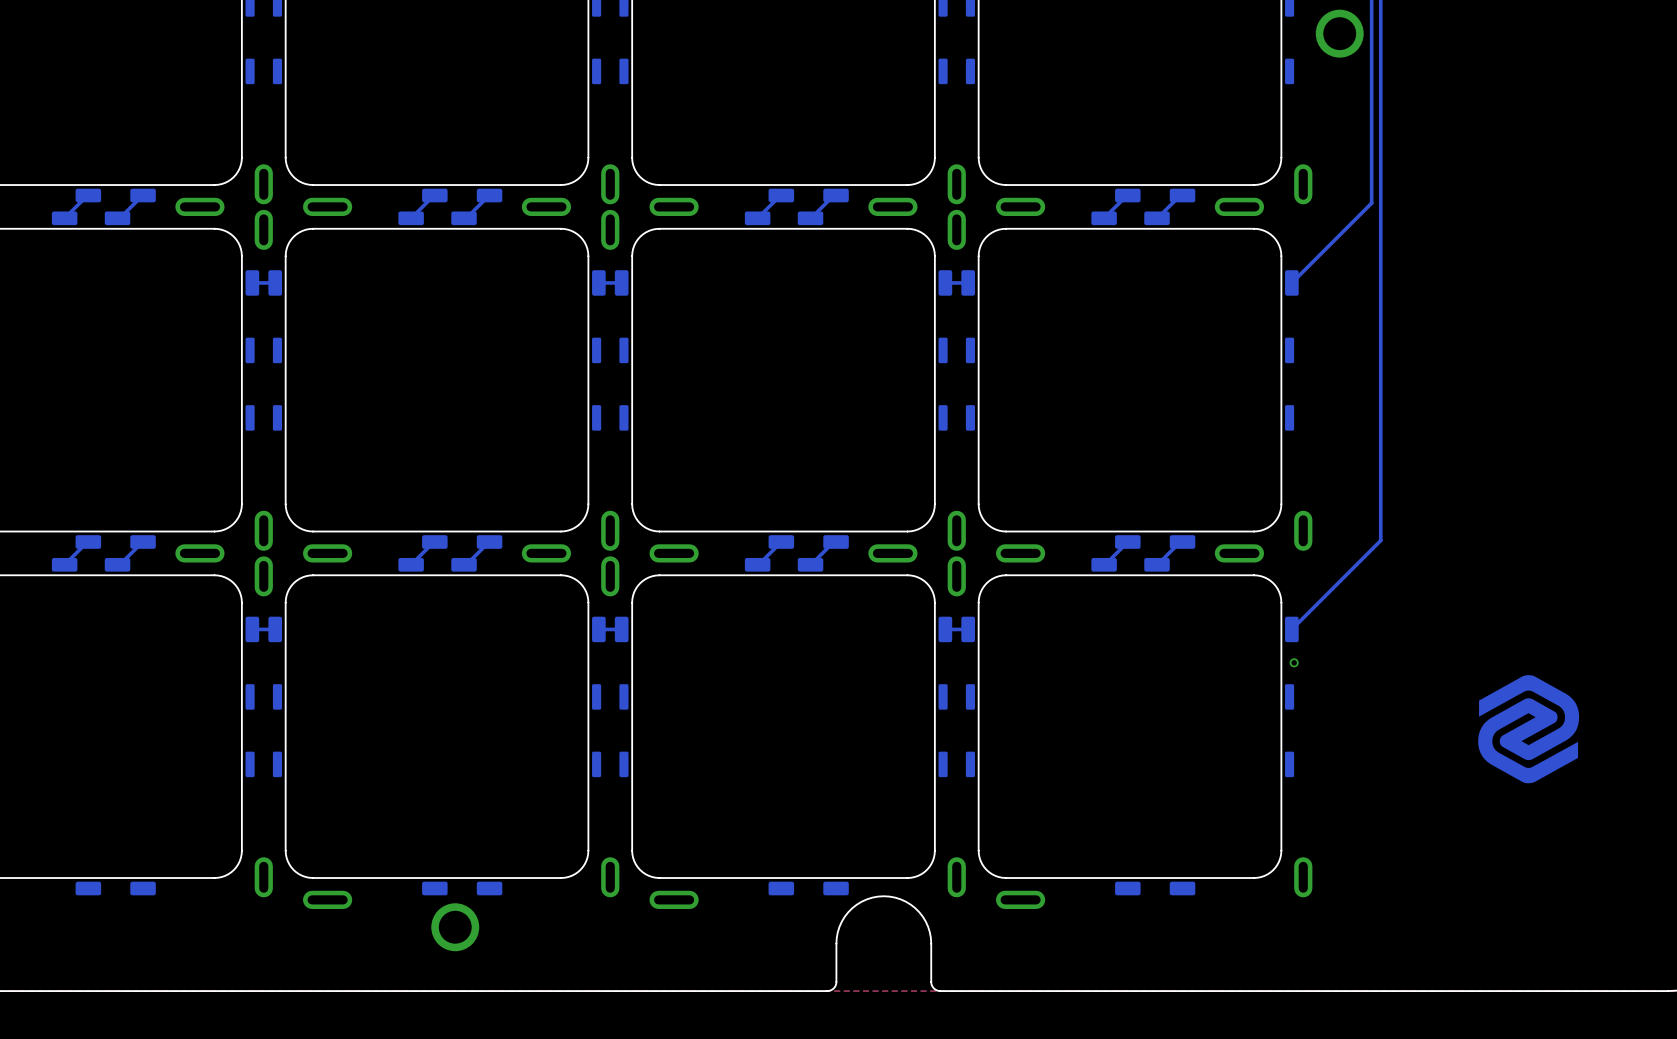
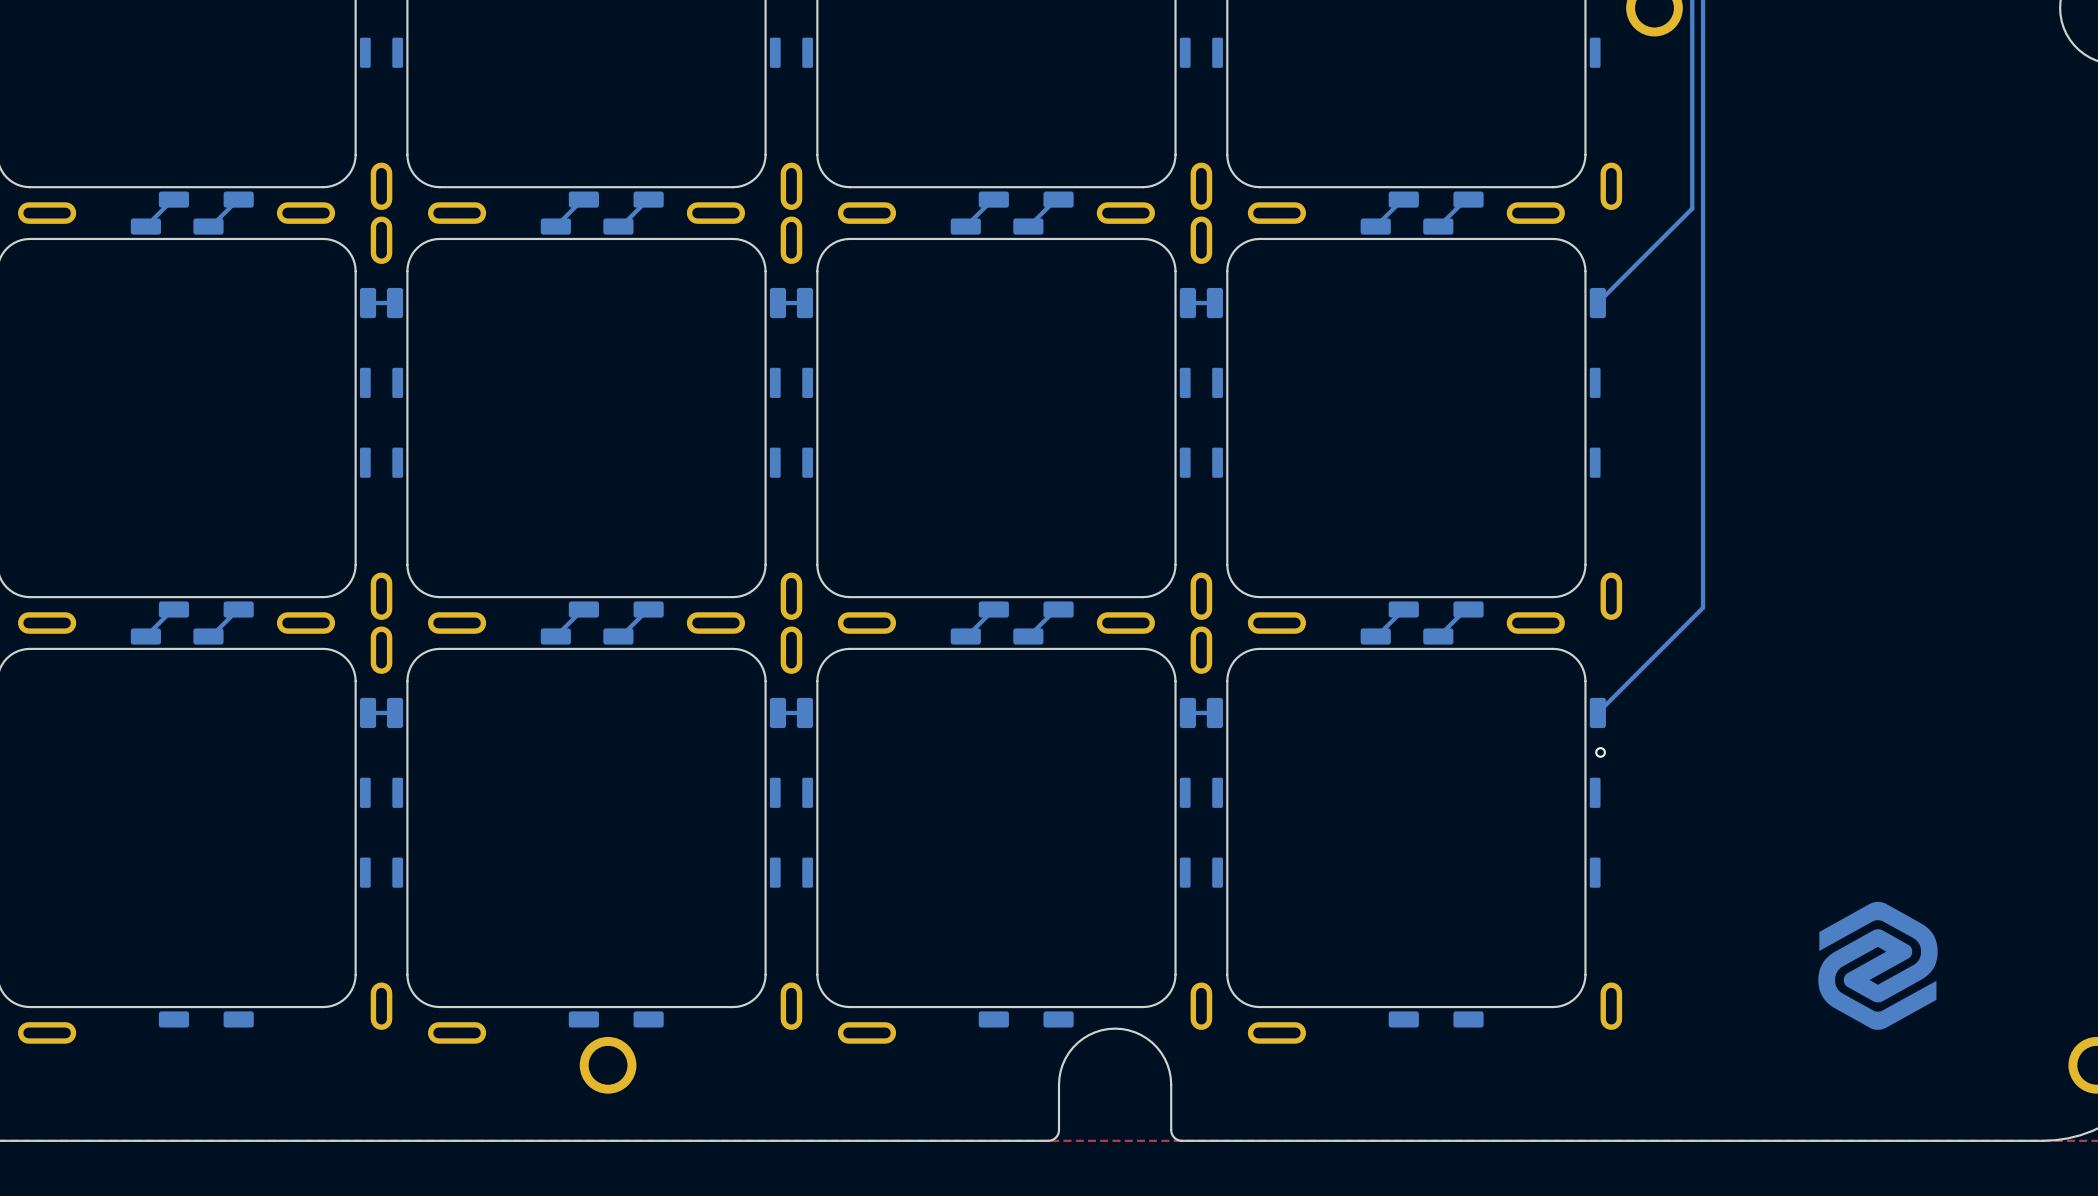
drawing position: (1528, 729) -> (1877, 965)

